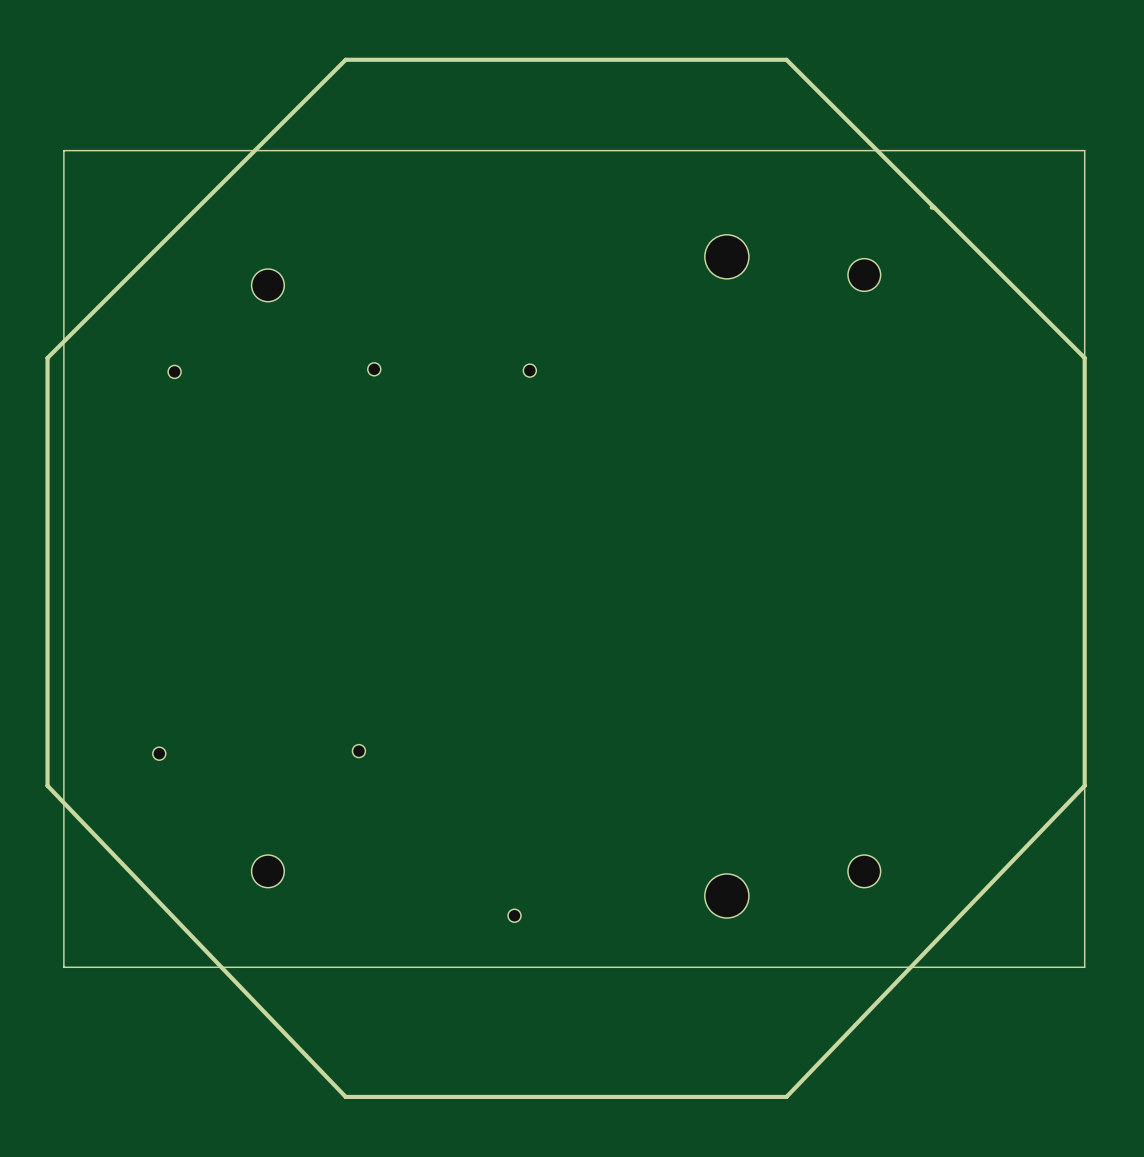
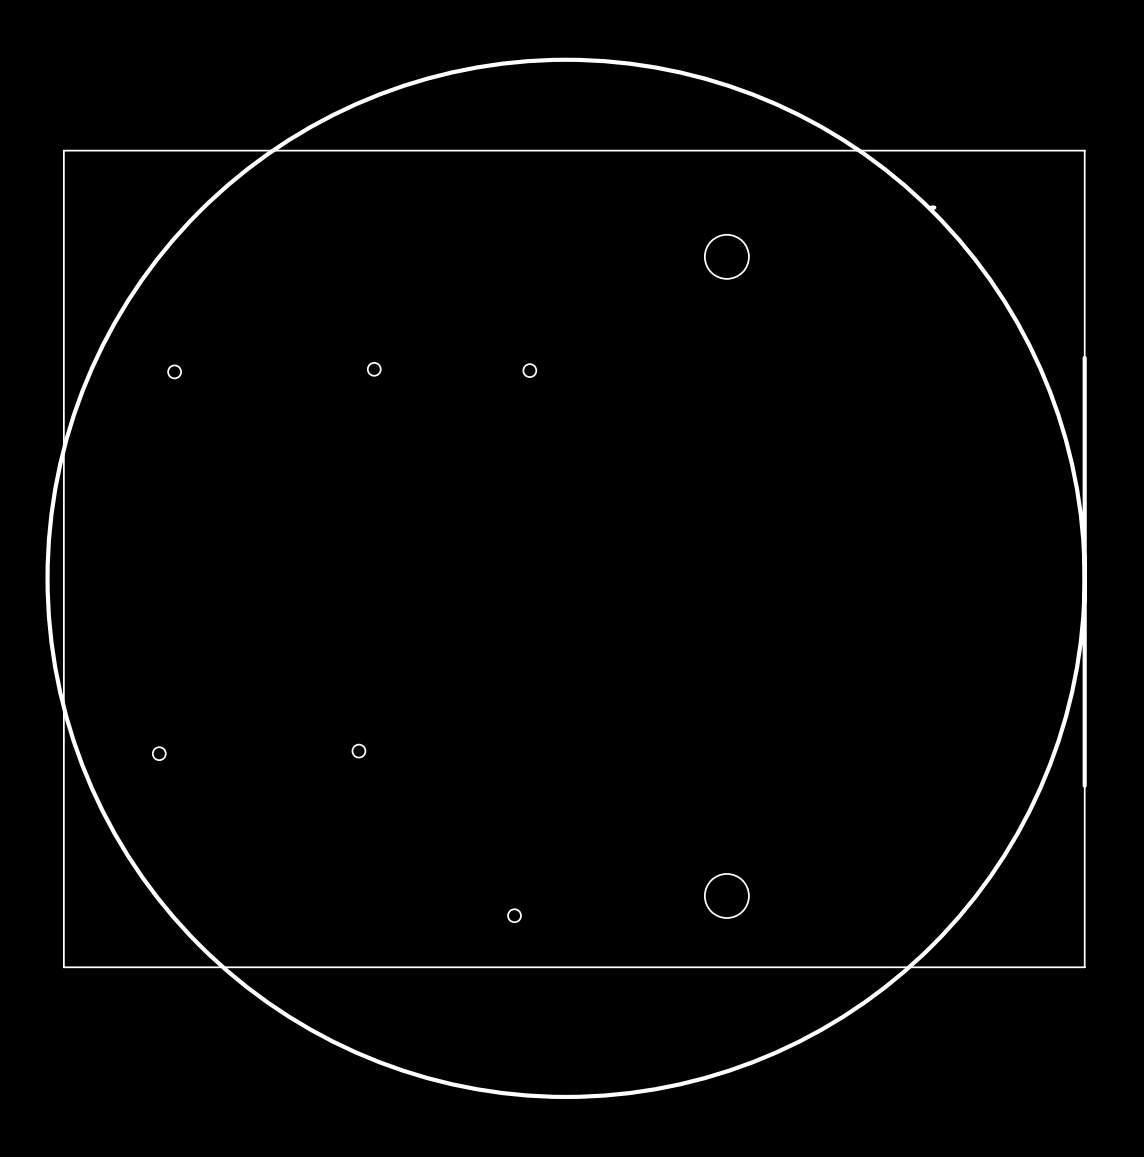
round board edge: none -> [45, 57, 1087, 1100]
hole: (864, 274) -> none
hole: (267, 285) -> none
board edge: (1084, 357) (786, 59) (345, 59) (47, 357) (47, 785) (345, 1096) (786, 1096) (1084, 785) -> none
hole: (267, 871) -> none
hole: (864, 871) -> none

